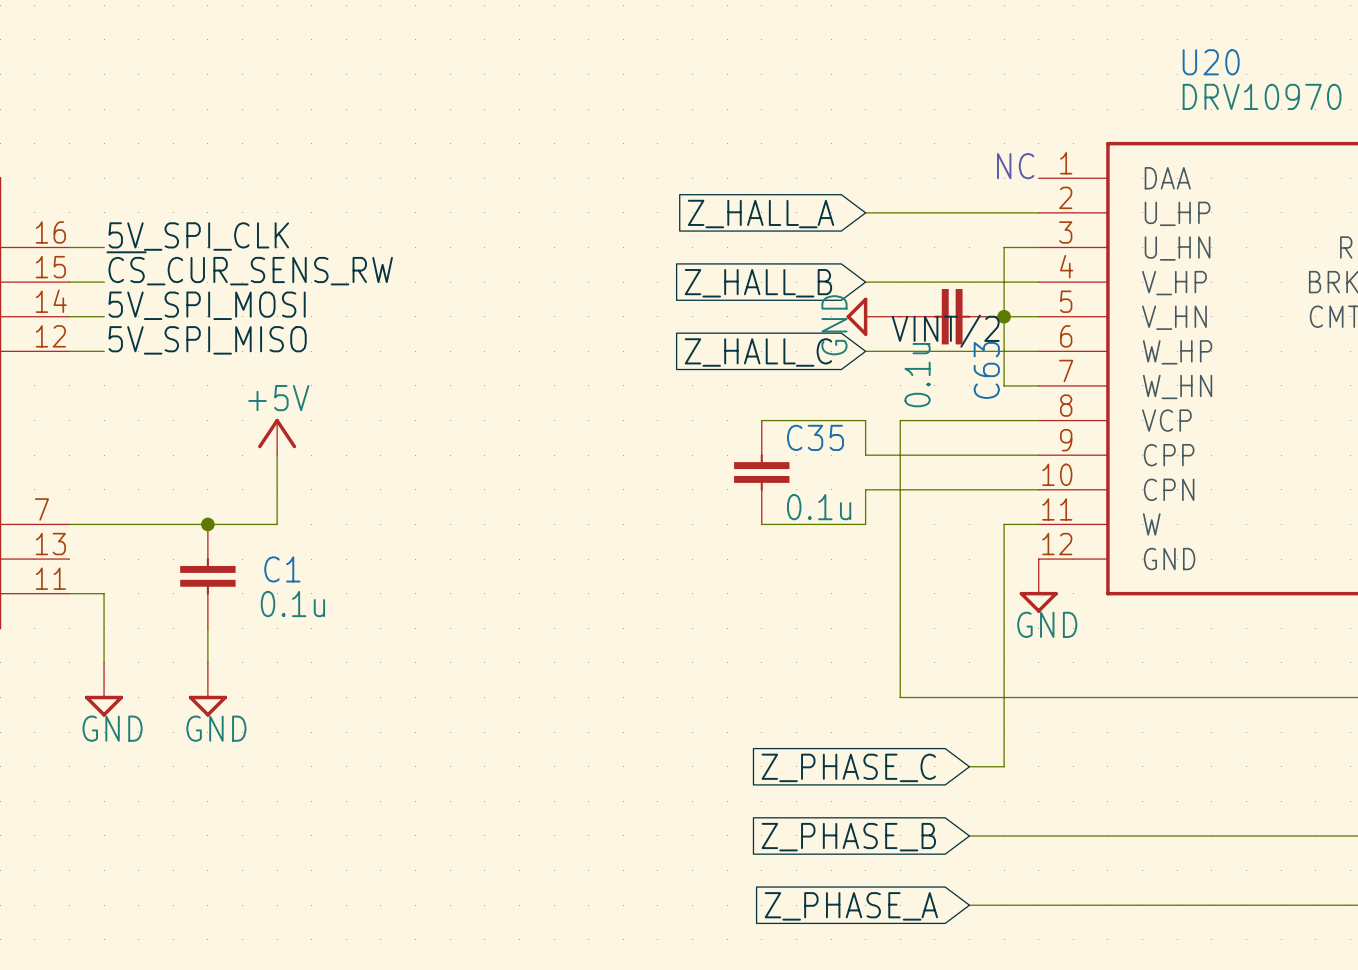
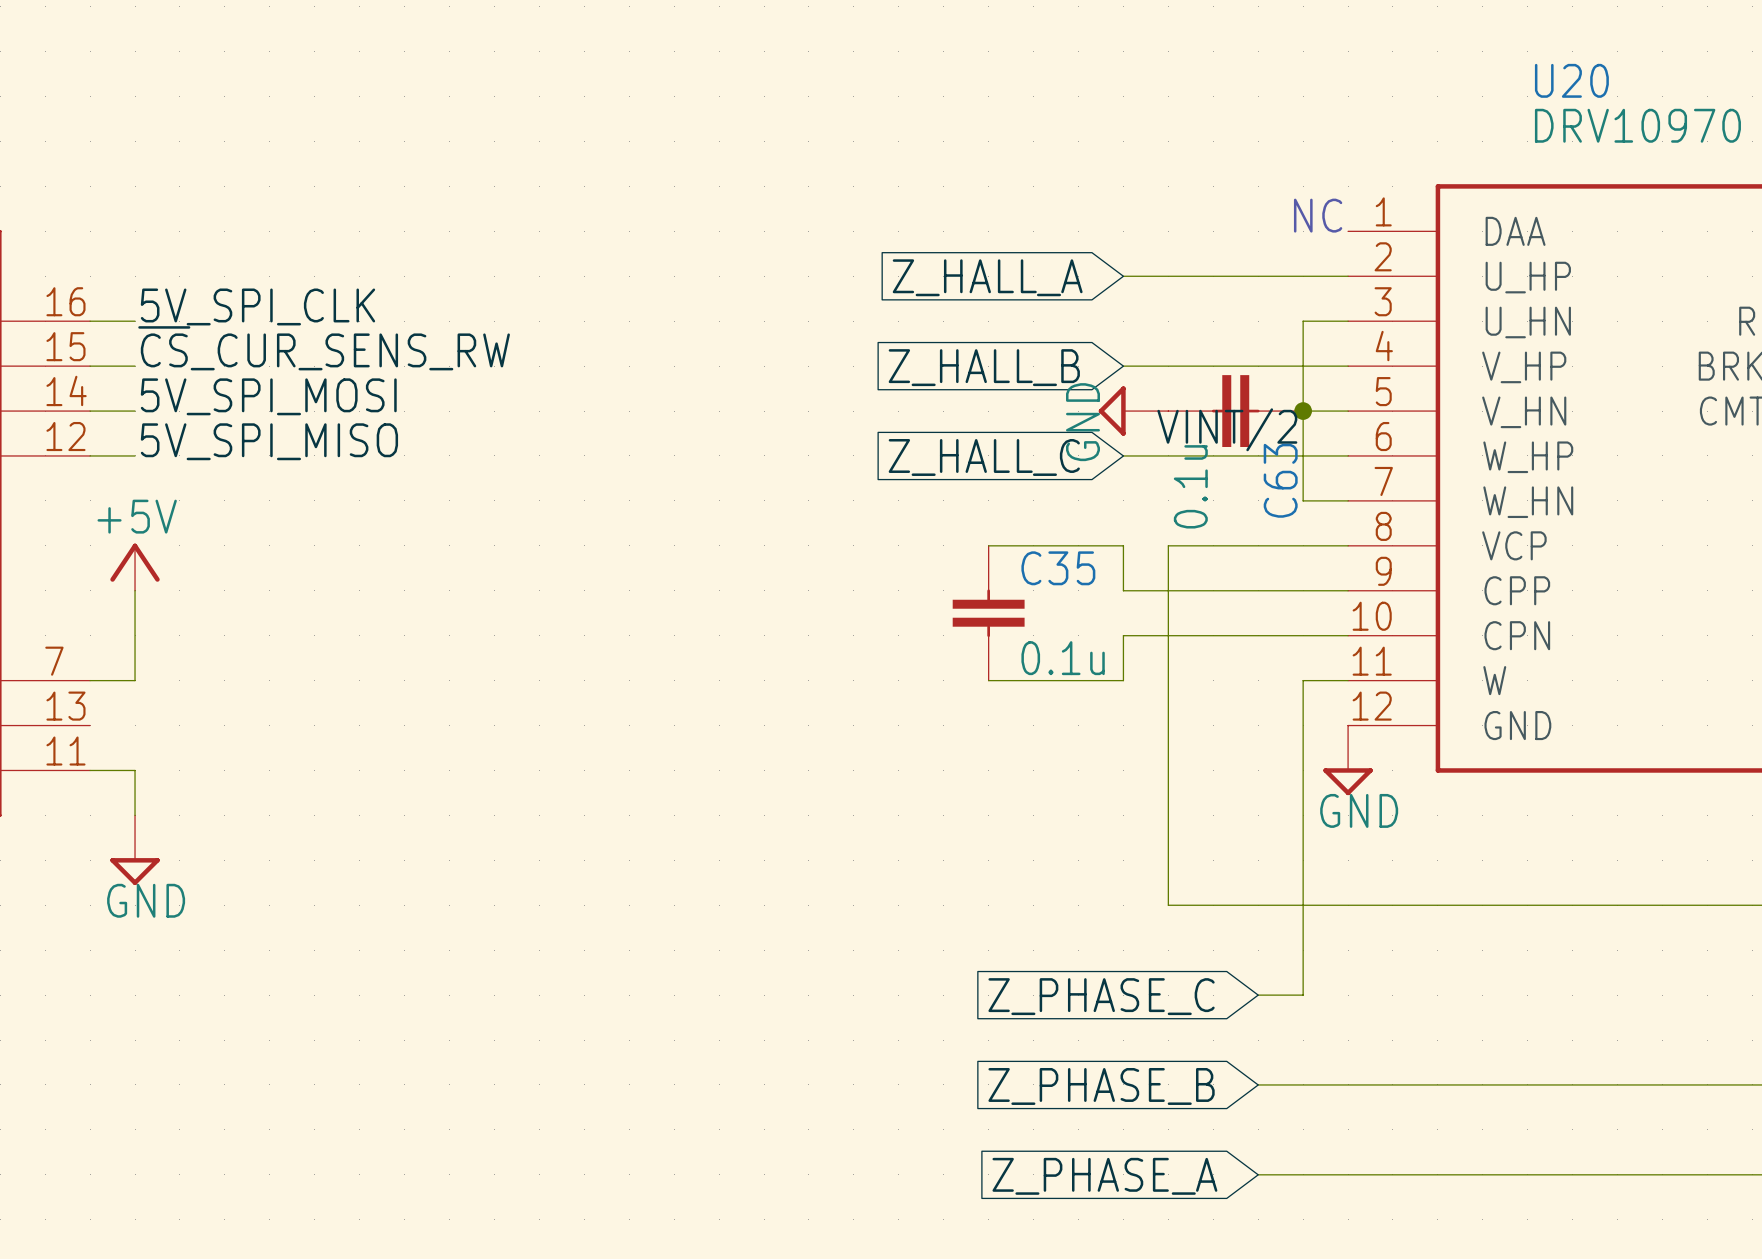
power symbol position: +5V (277, 437) -> +5V (135, 567)
wire: (277, 455) (277, 524) (104, 524) -> (135, 590) (135, 680)
junction: (207, 524) -> none
C1: 0.1u (207, 576) -> none
wire: (207, 628) (207, 662) -> none
power symbol position: GND (104, 689) -> GND (135, 850)
power symbol: GND (207, 689) -> none

